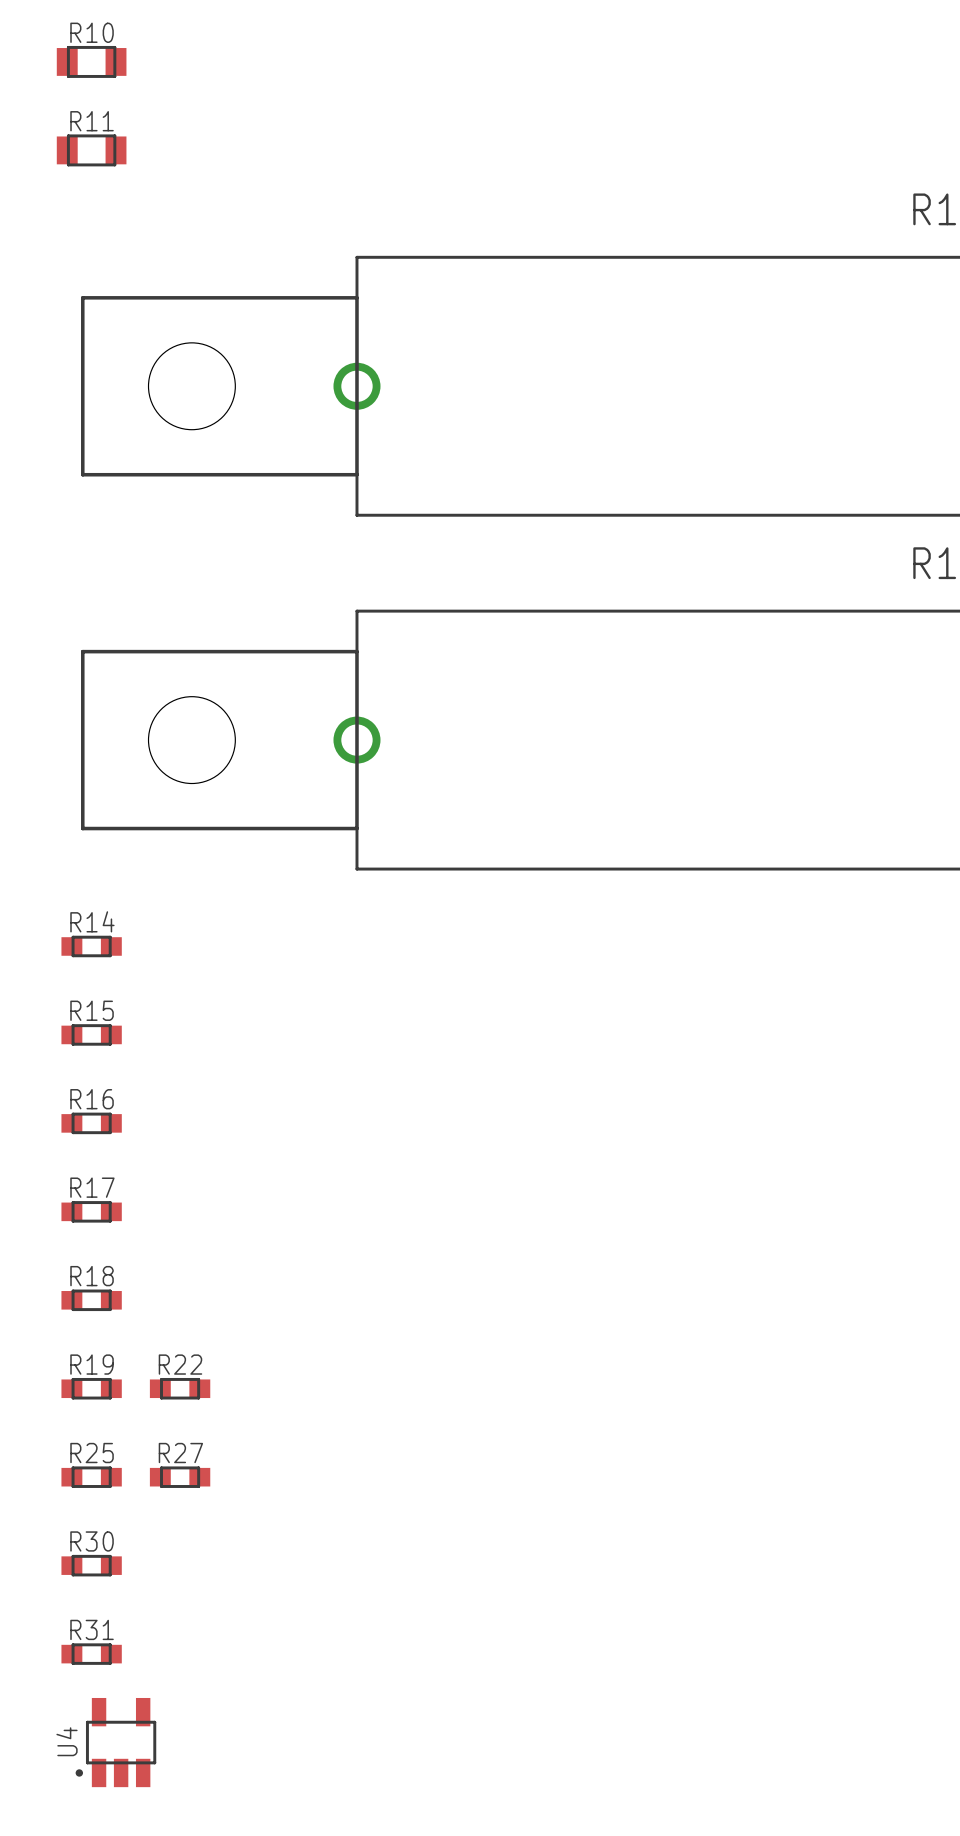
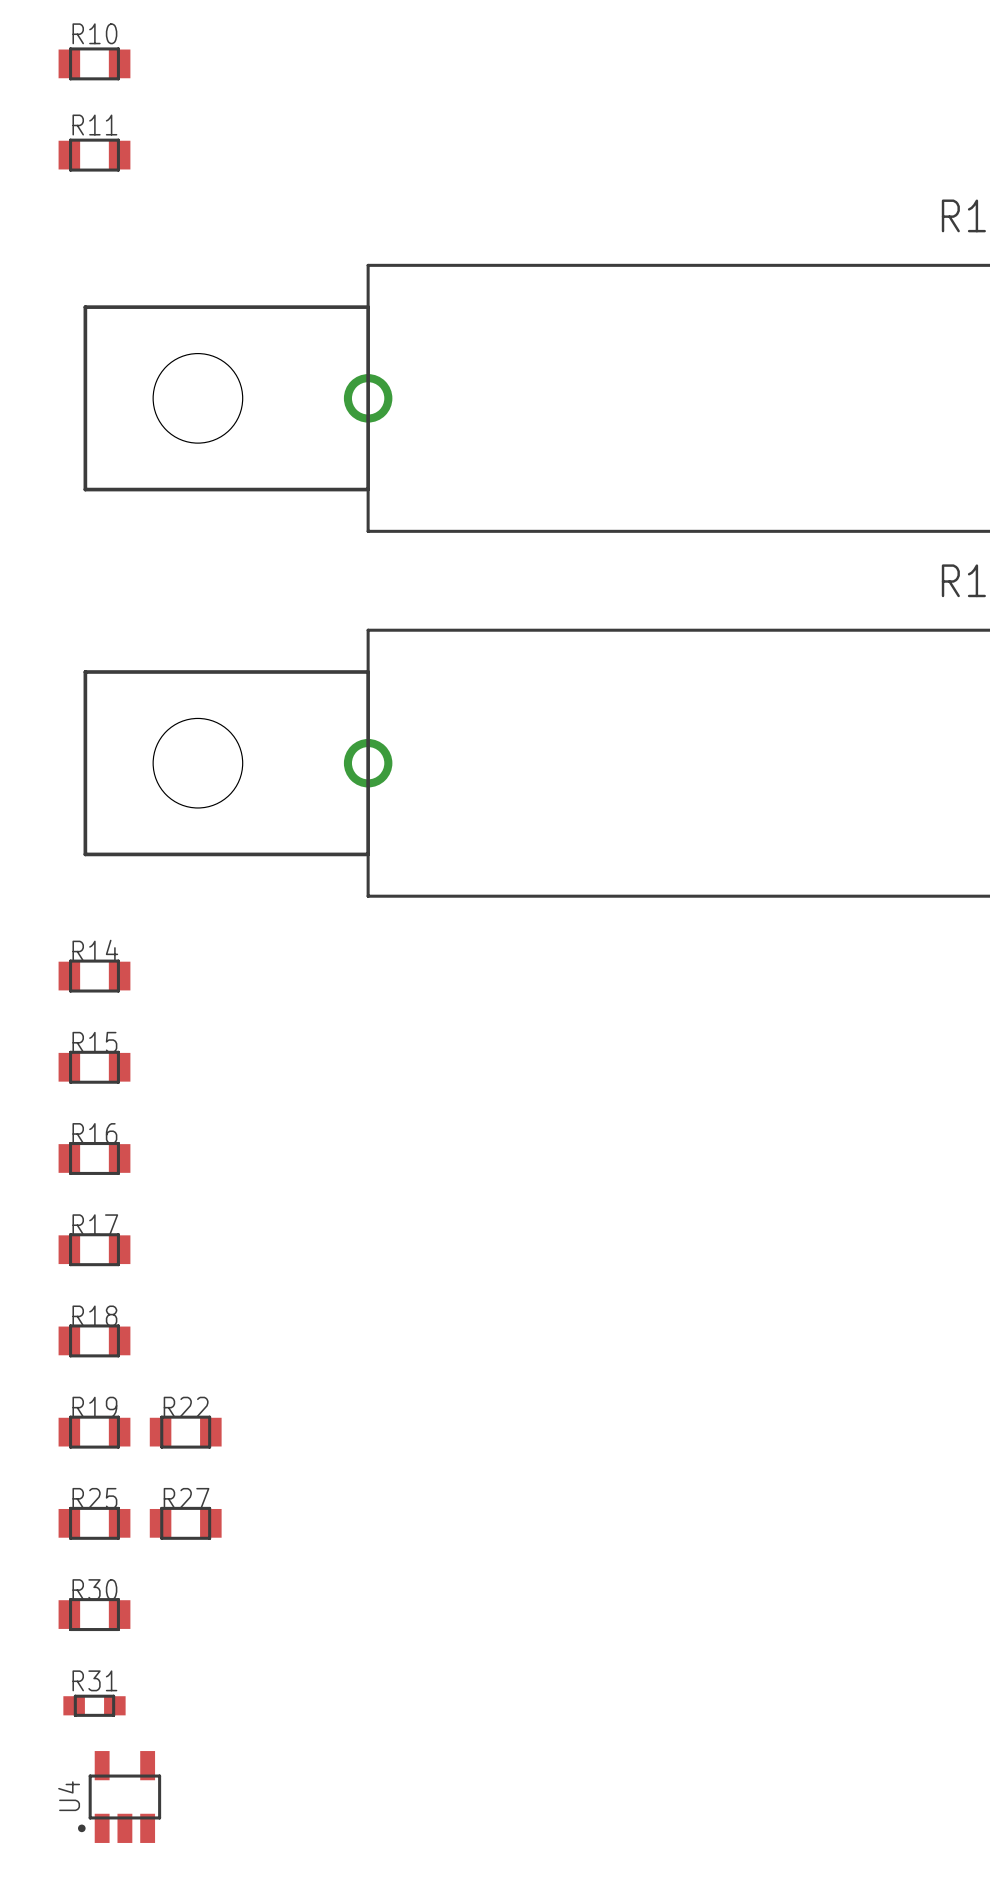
R14 footprint: [61, 935, 122, 958] -> [58, 959, 131, 993]
R15 footprint: [61, 1024, 122, 1046] -> [58, 1050, 131, 1084]
R16 footprint: [61, 1112, 122, 1135] -> [58, 1142, 131, 1175]
R17 footprint: [61, 1201, 122, 1223] -> [58, 1233, 131, 1267]
R18 footprint: [61, 1289, 122, 1312] -> [58, 1324, 131, 1358]
R19 footprint: [61, 1377, 122, 1400] -> [58, 1415, 131, 1449]
R22 footprint: [149, 1377, 211, 1400] -> [149, 1415, 222, 1449]
R25 footprint: [61, 1466, 122, 1488] -> [58, 1506, 131, 1540]
R27 footprint: [149, 1466, 211, 1488] -> [149, 1506, 222, 1540]
R30 footprint: [61, 1554, 122, 1577] -> [58, 1598, 131, 1632]

